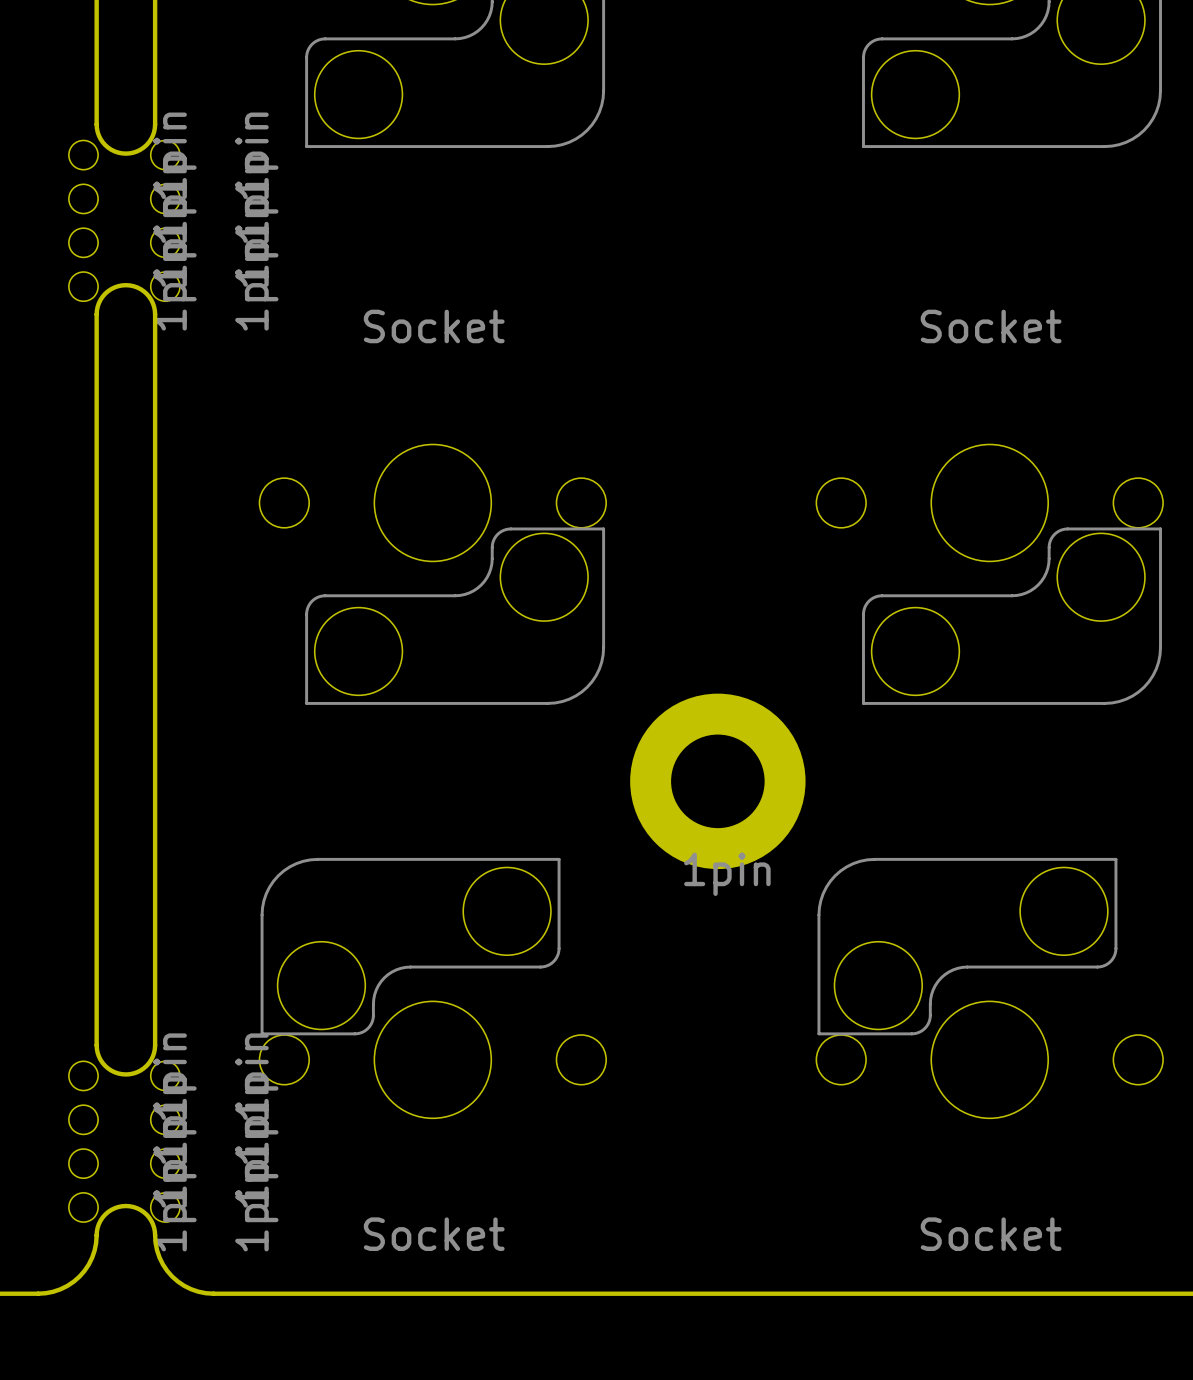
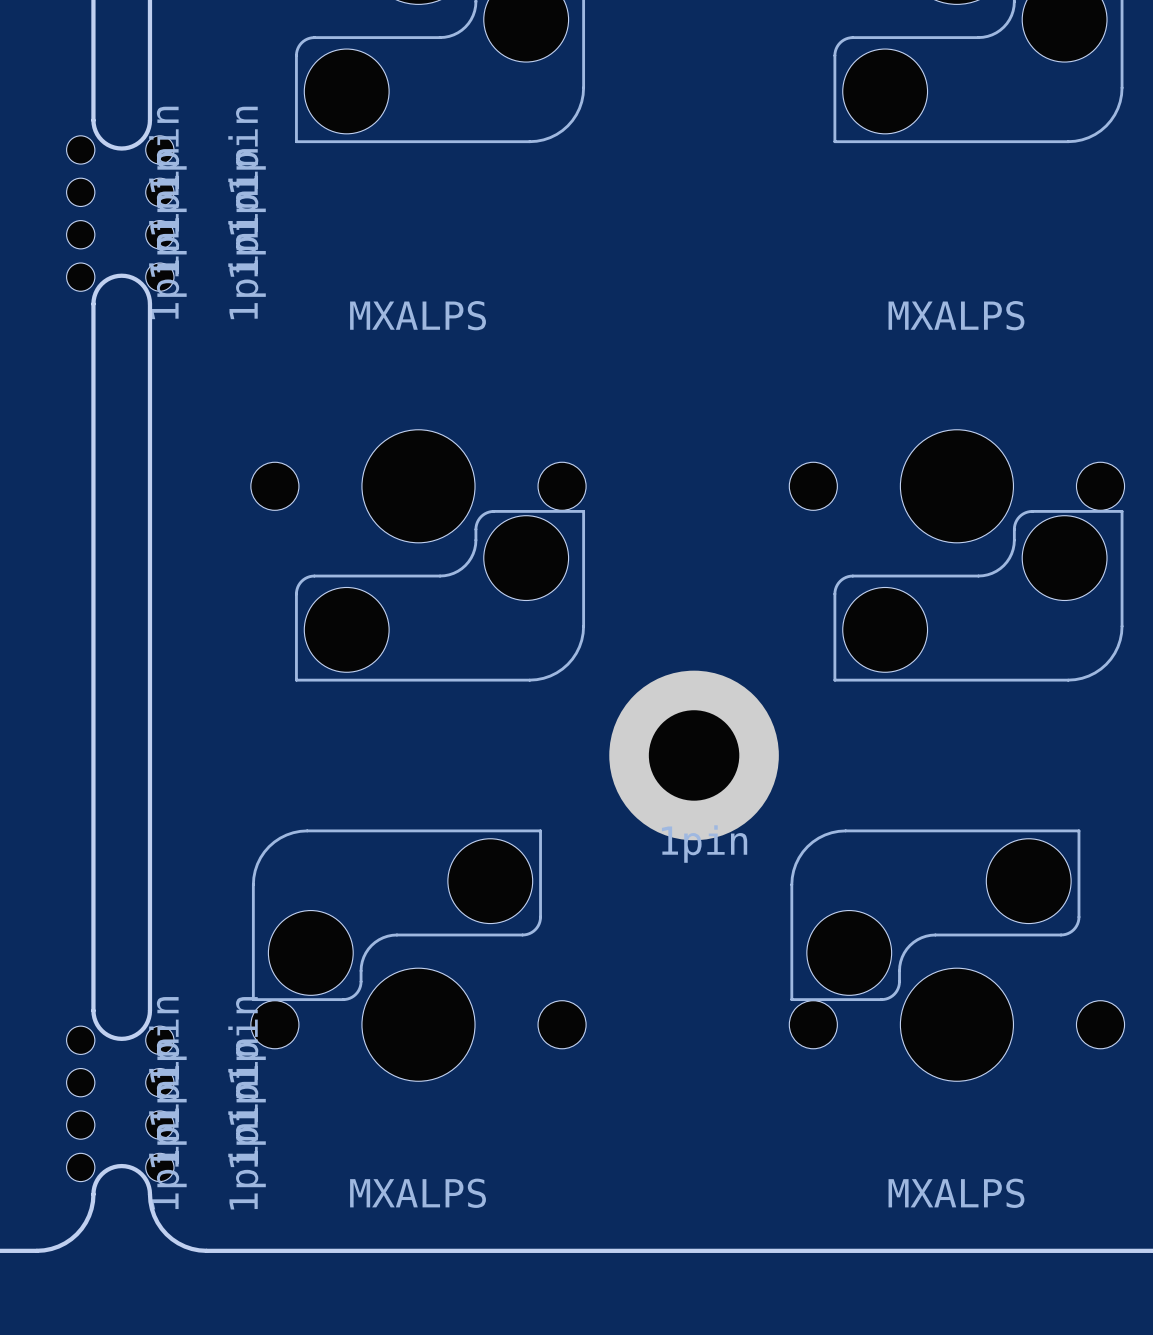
part value: Socket (434, 326) -> MXALPS (418, 315)
part value: Socket (991, 326) -> MXALPS (956, 315)
part value: Socket (434, 1234) -> MXALPS (418, 1193)
part value: Socket (991, 1234) -> MXALPS (956, 1193)

